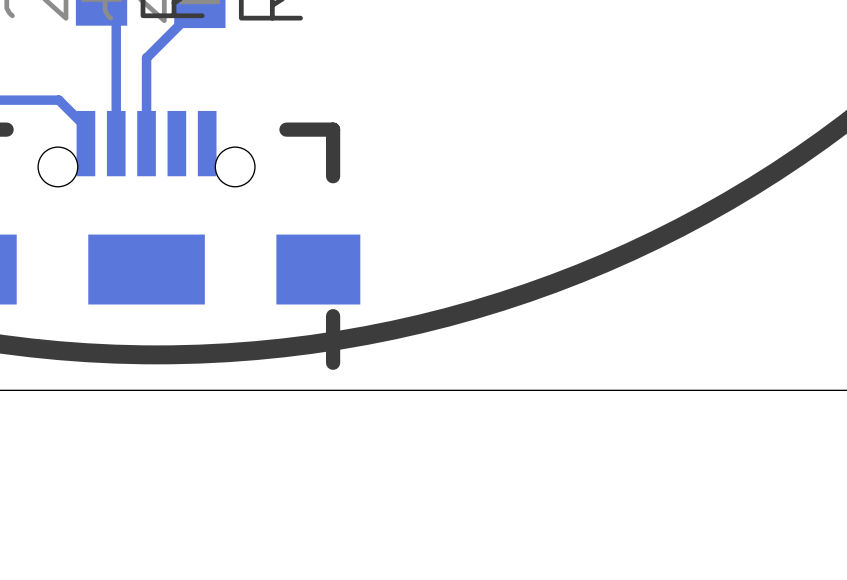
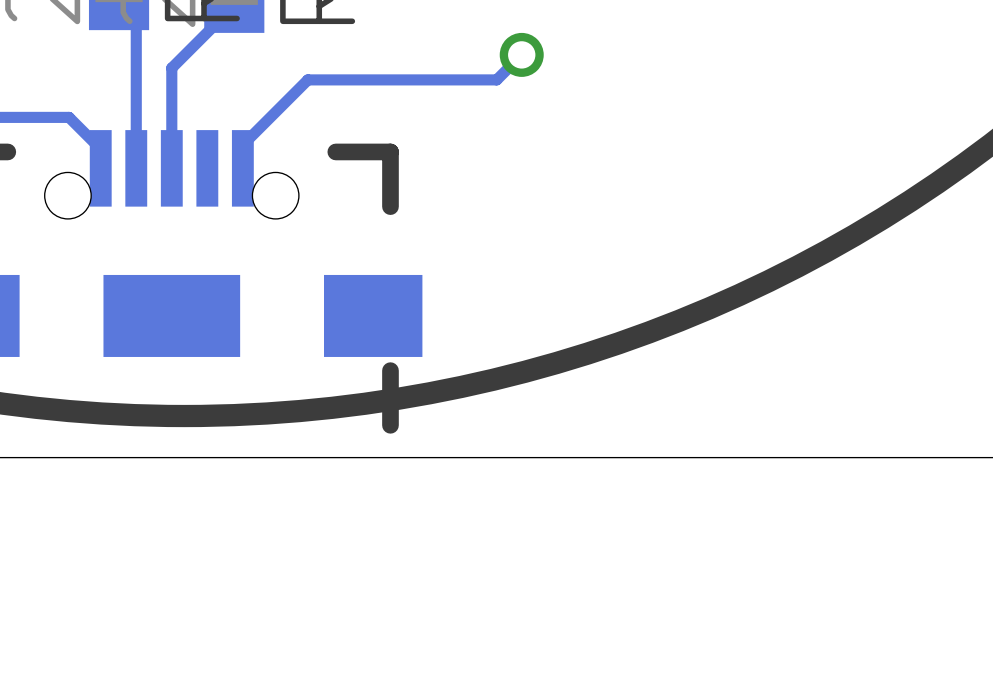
track: none -> (521, 54) (496, 79) (307, 79) (242, 144) (242, 168)
via: none -> (521, 54)

